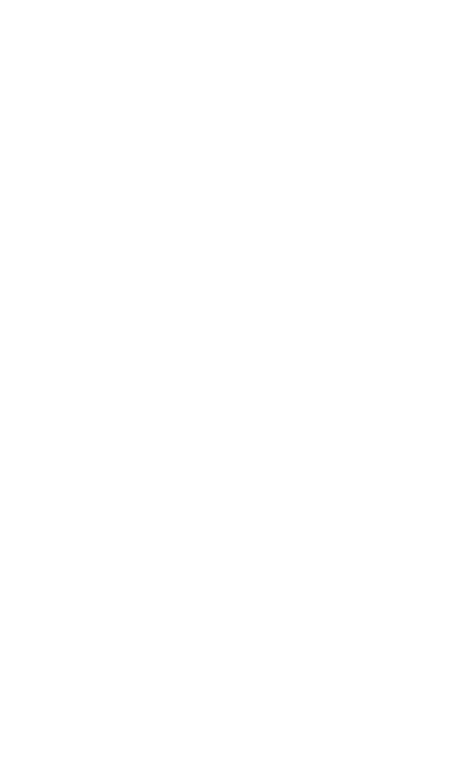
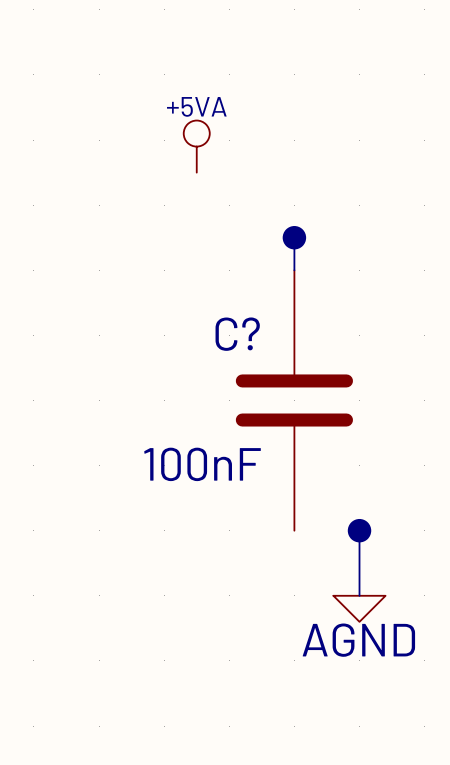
power symbol: none -> +5VA (196, 146)
wire: none -> (294, 237) (294, 270)
junction: none -> (294, 237)
C?: none -> 100nF (294, 400)
wire: none -> (359, 530) (359, 595)
junction: none -> (359, 530)
power symbol: none -> AGND (359, 608)

